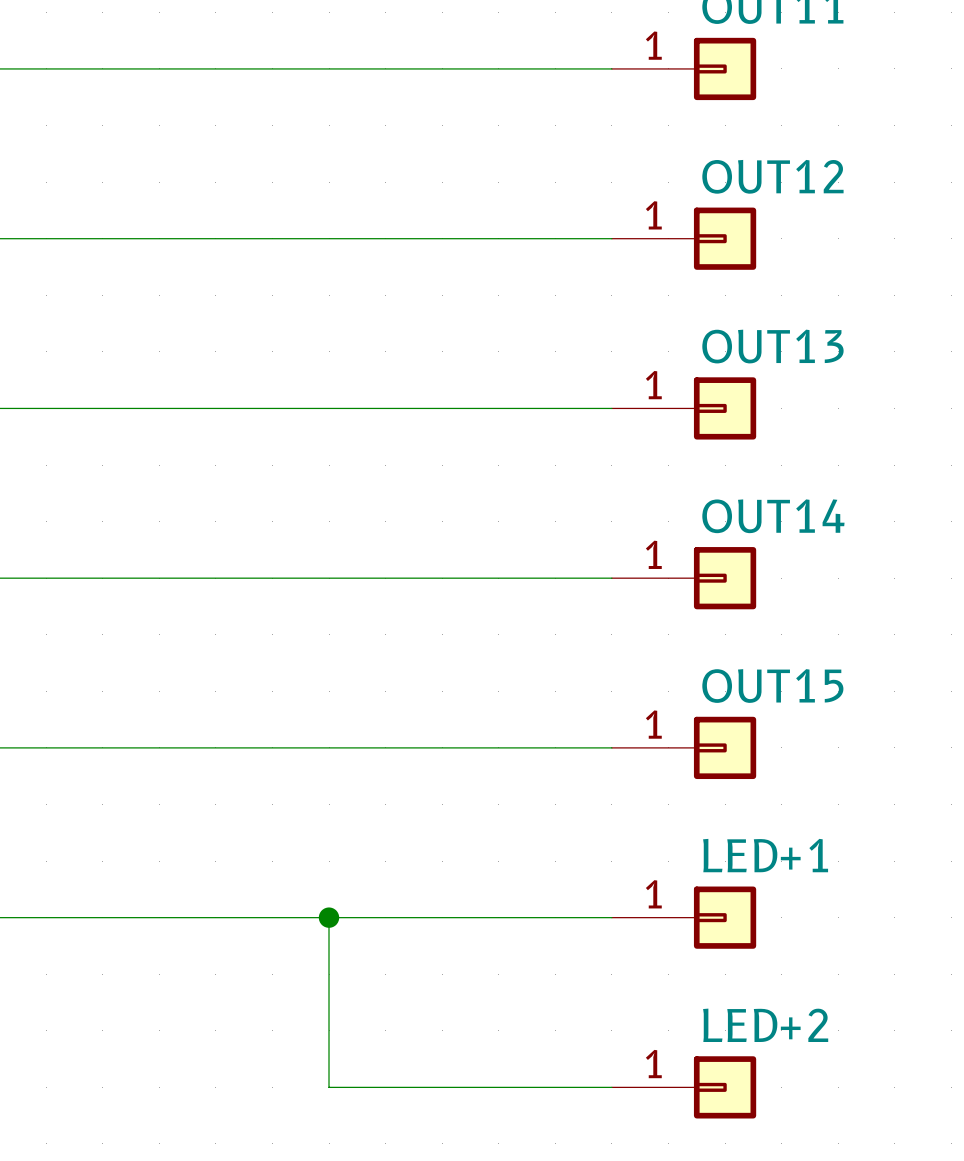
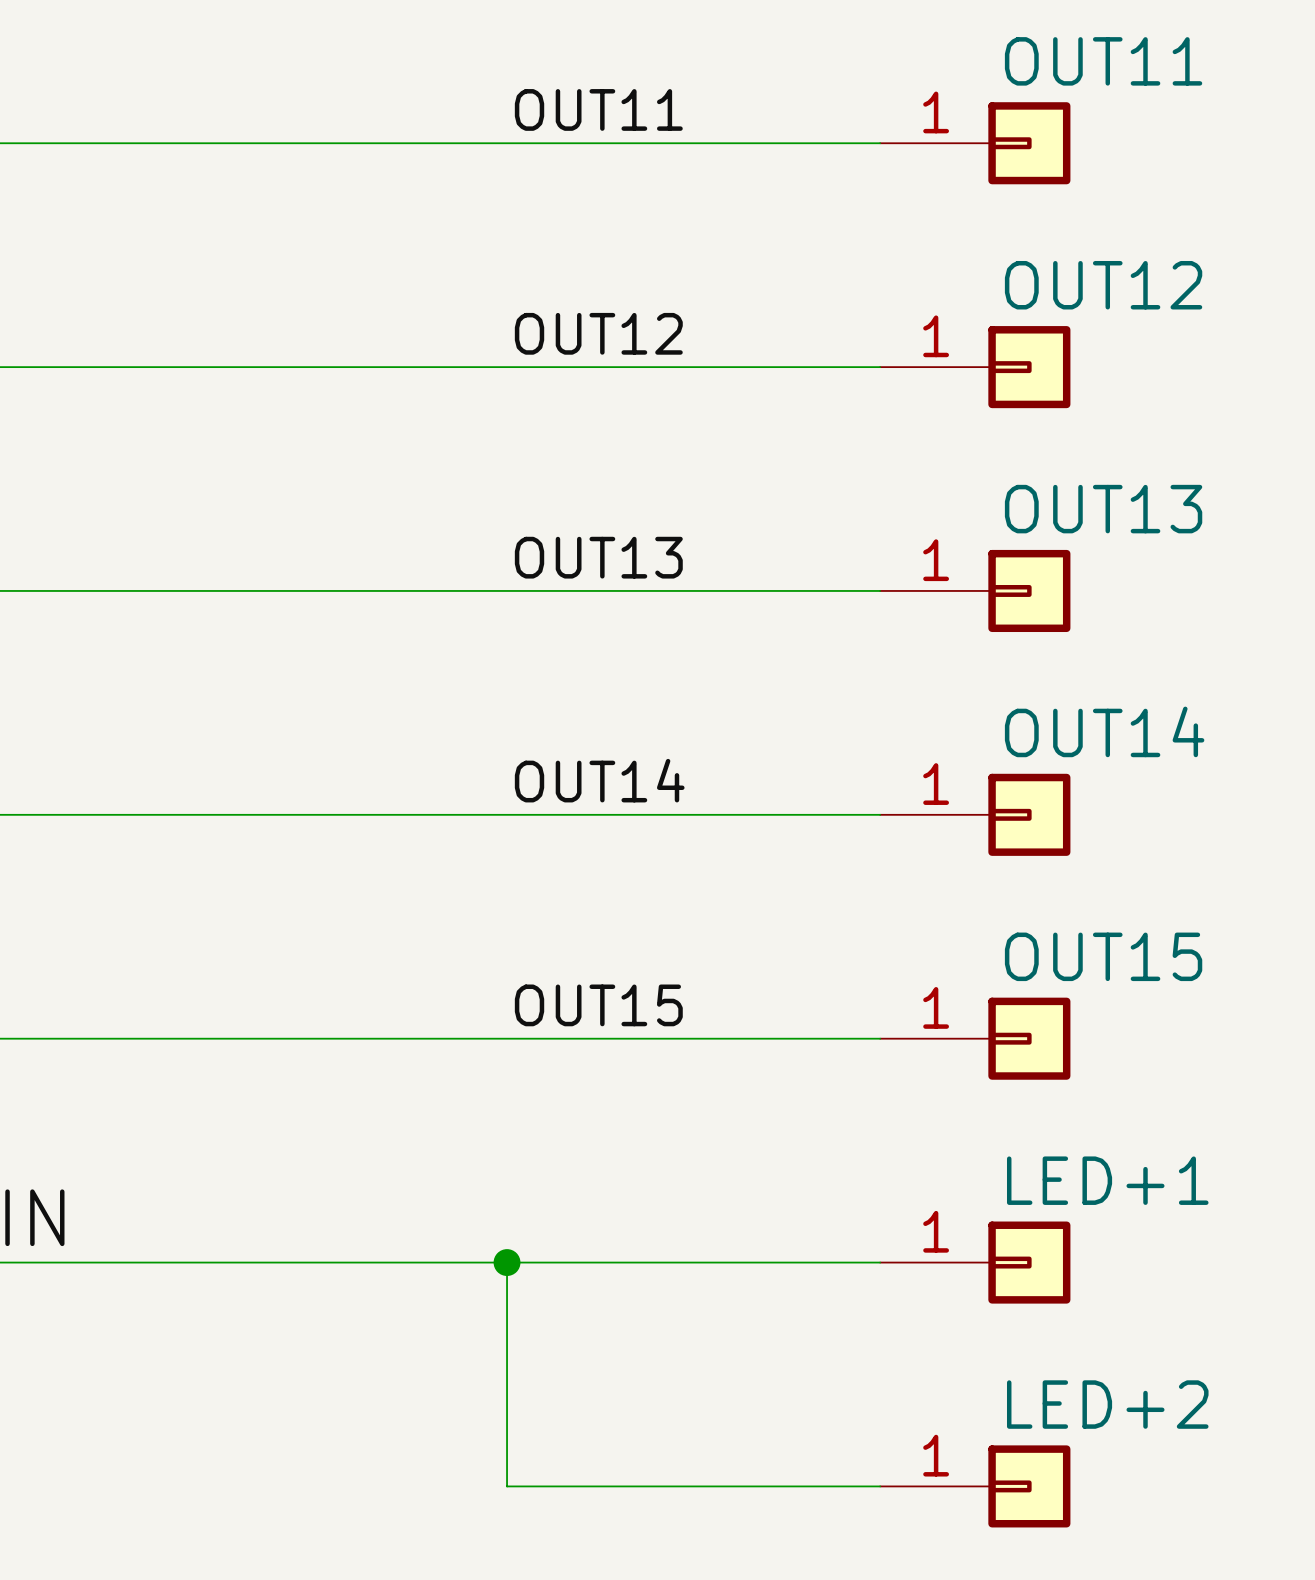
label: none -> OUT11 (598, 109)
label: none -> OUT12 (598, 333)
label: none -> OUT13 (598, 557)
label: none -> OUT14 (599, 780)
label: none -> OUT15 (598, 1005)

